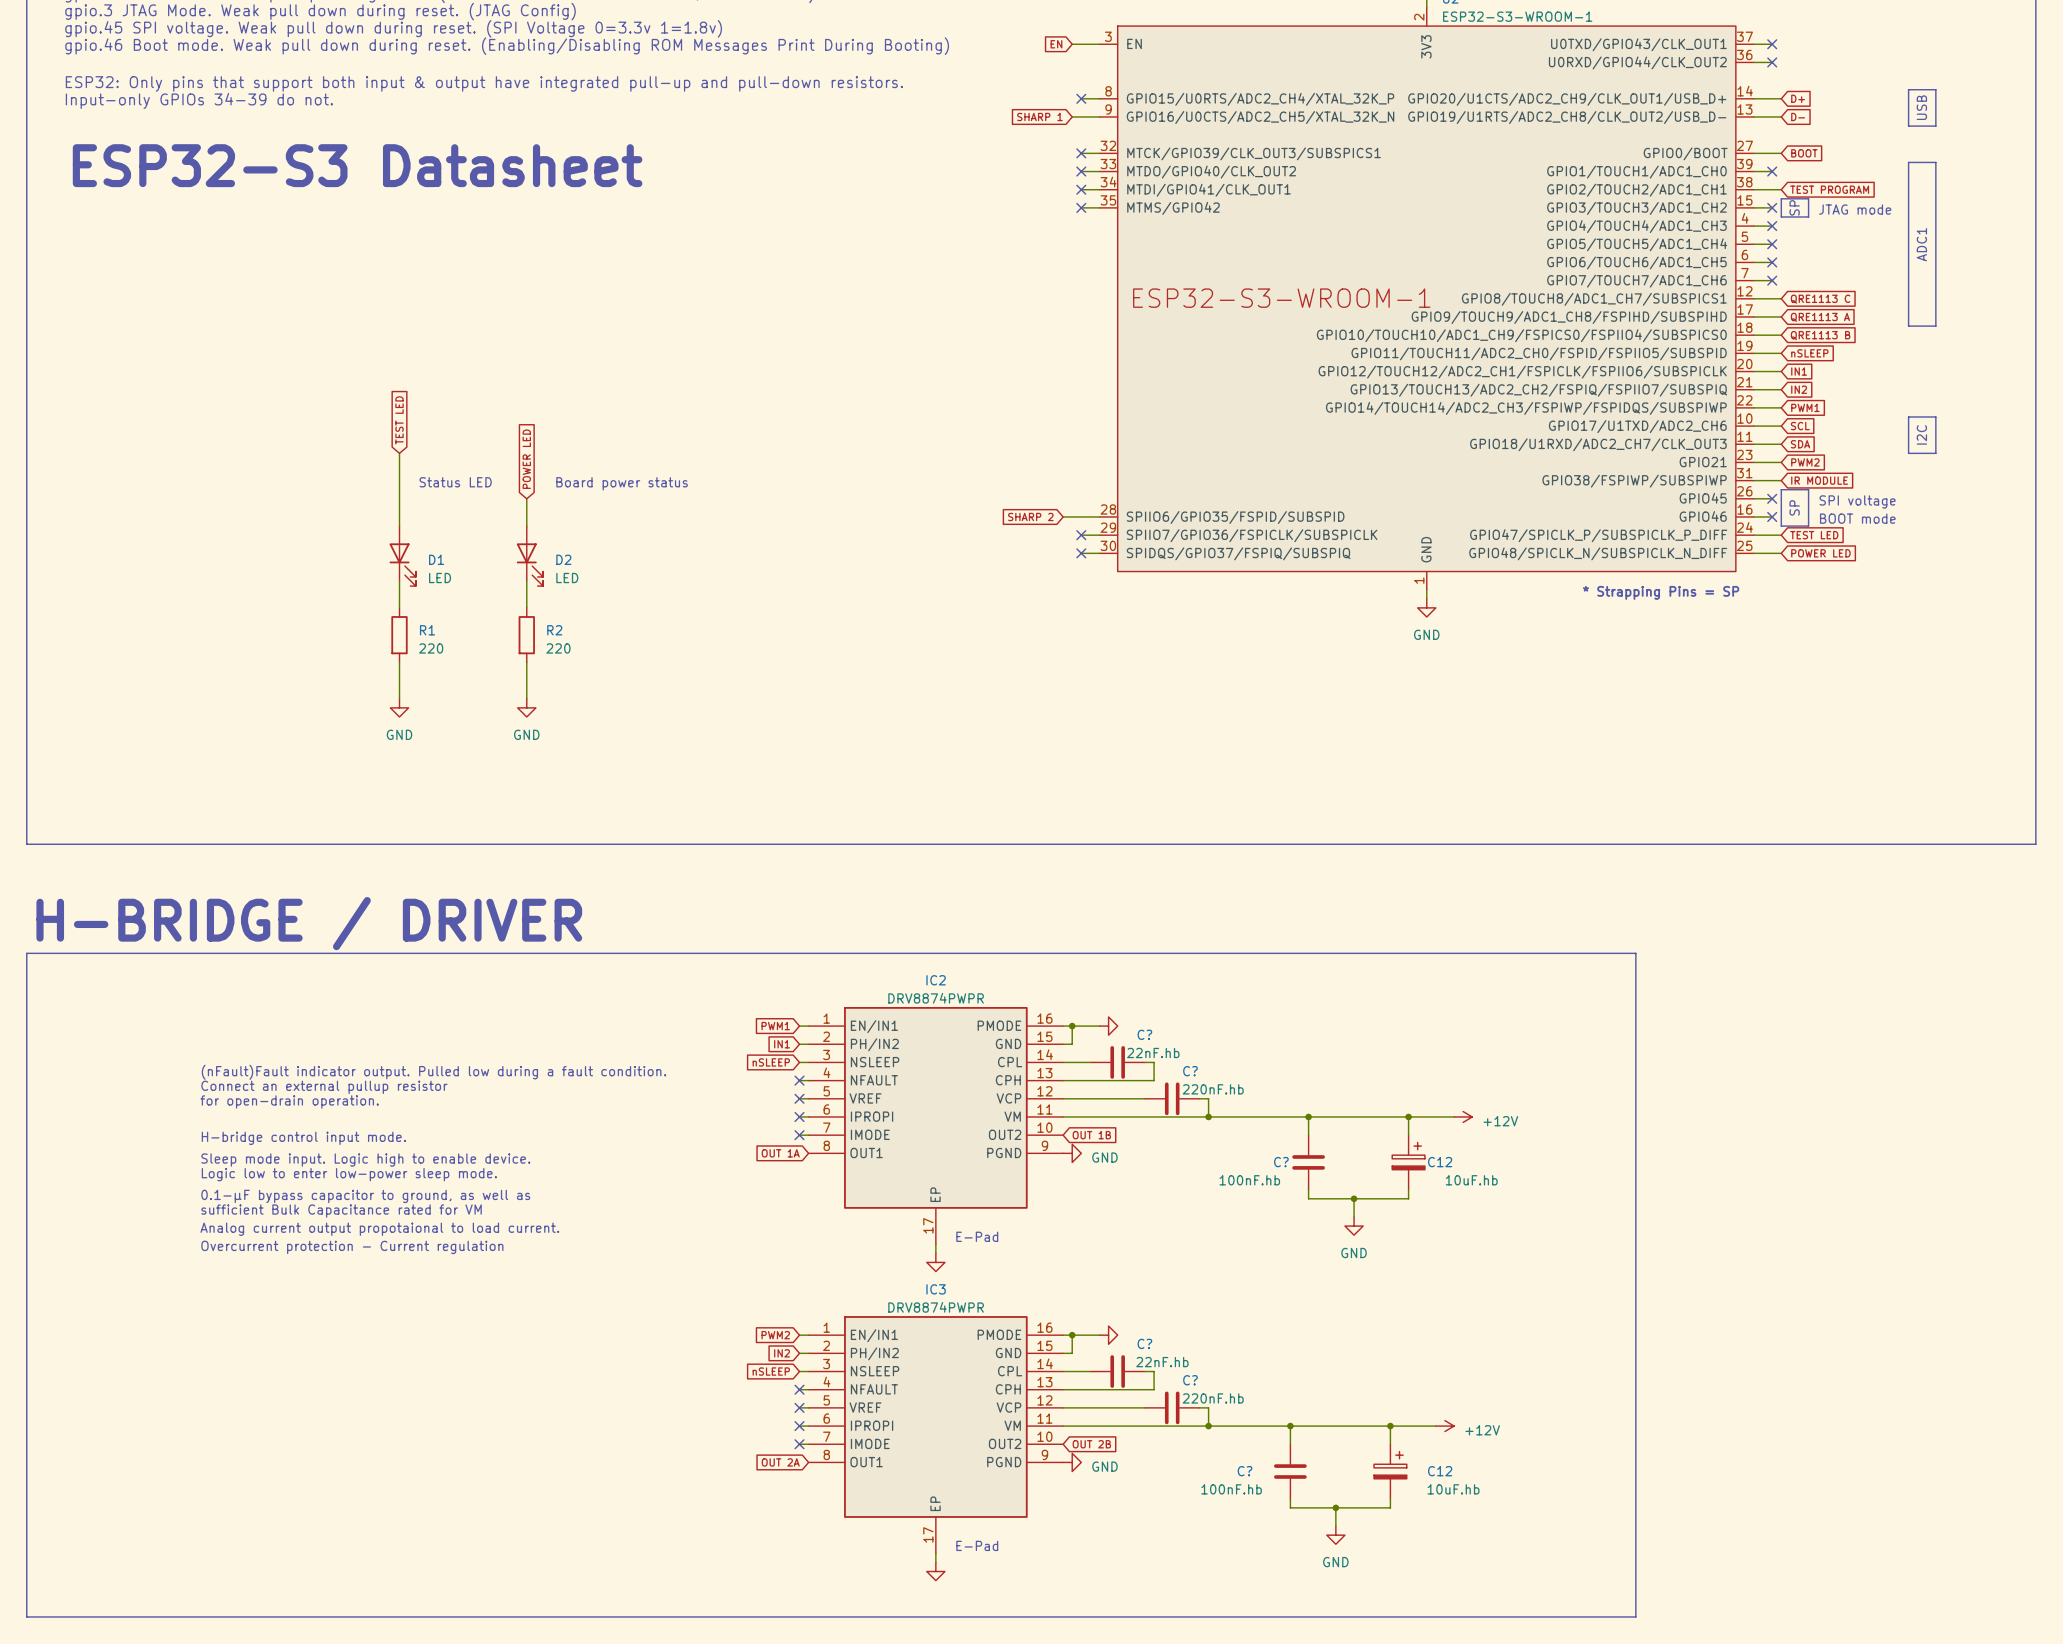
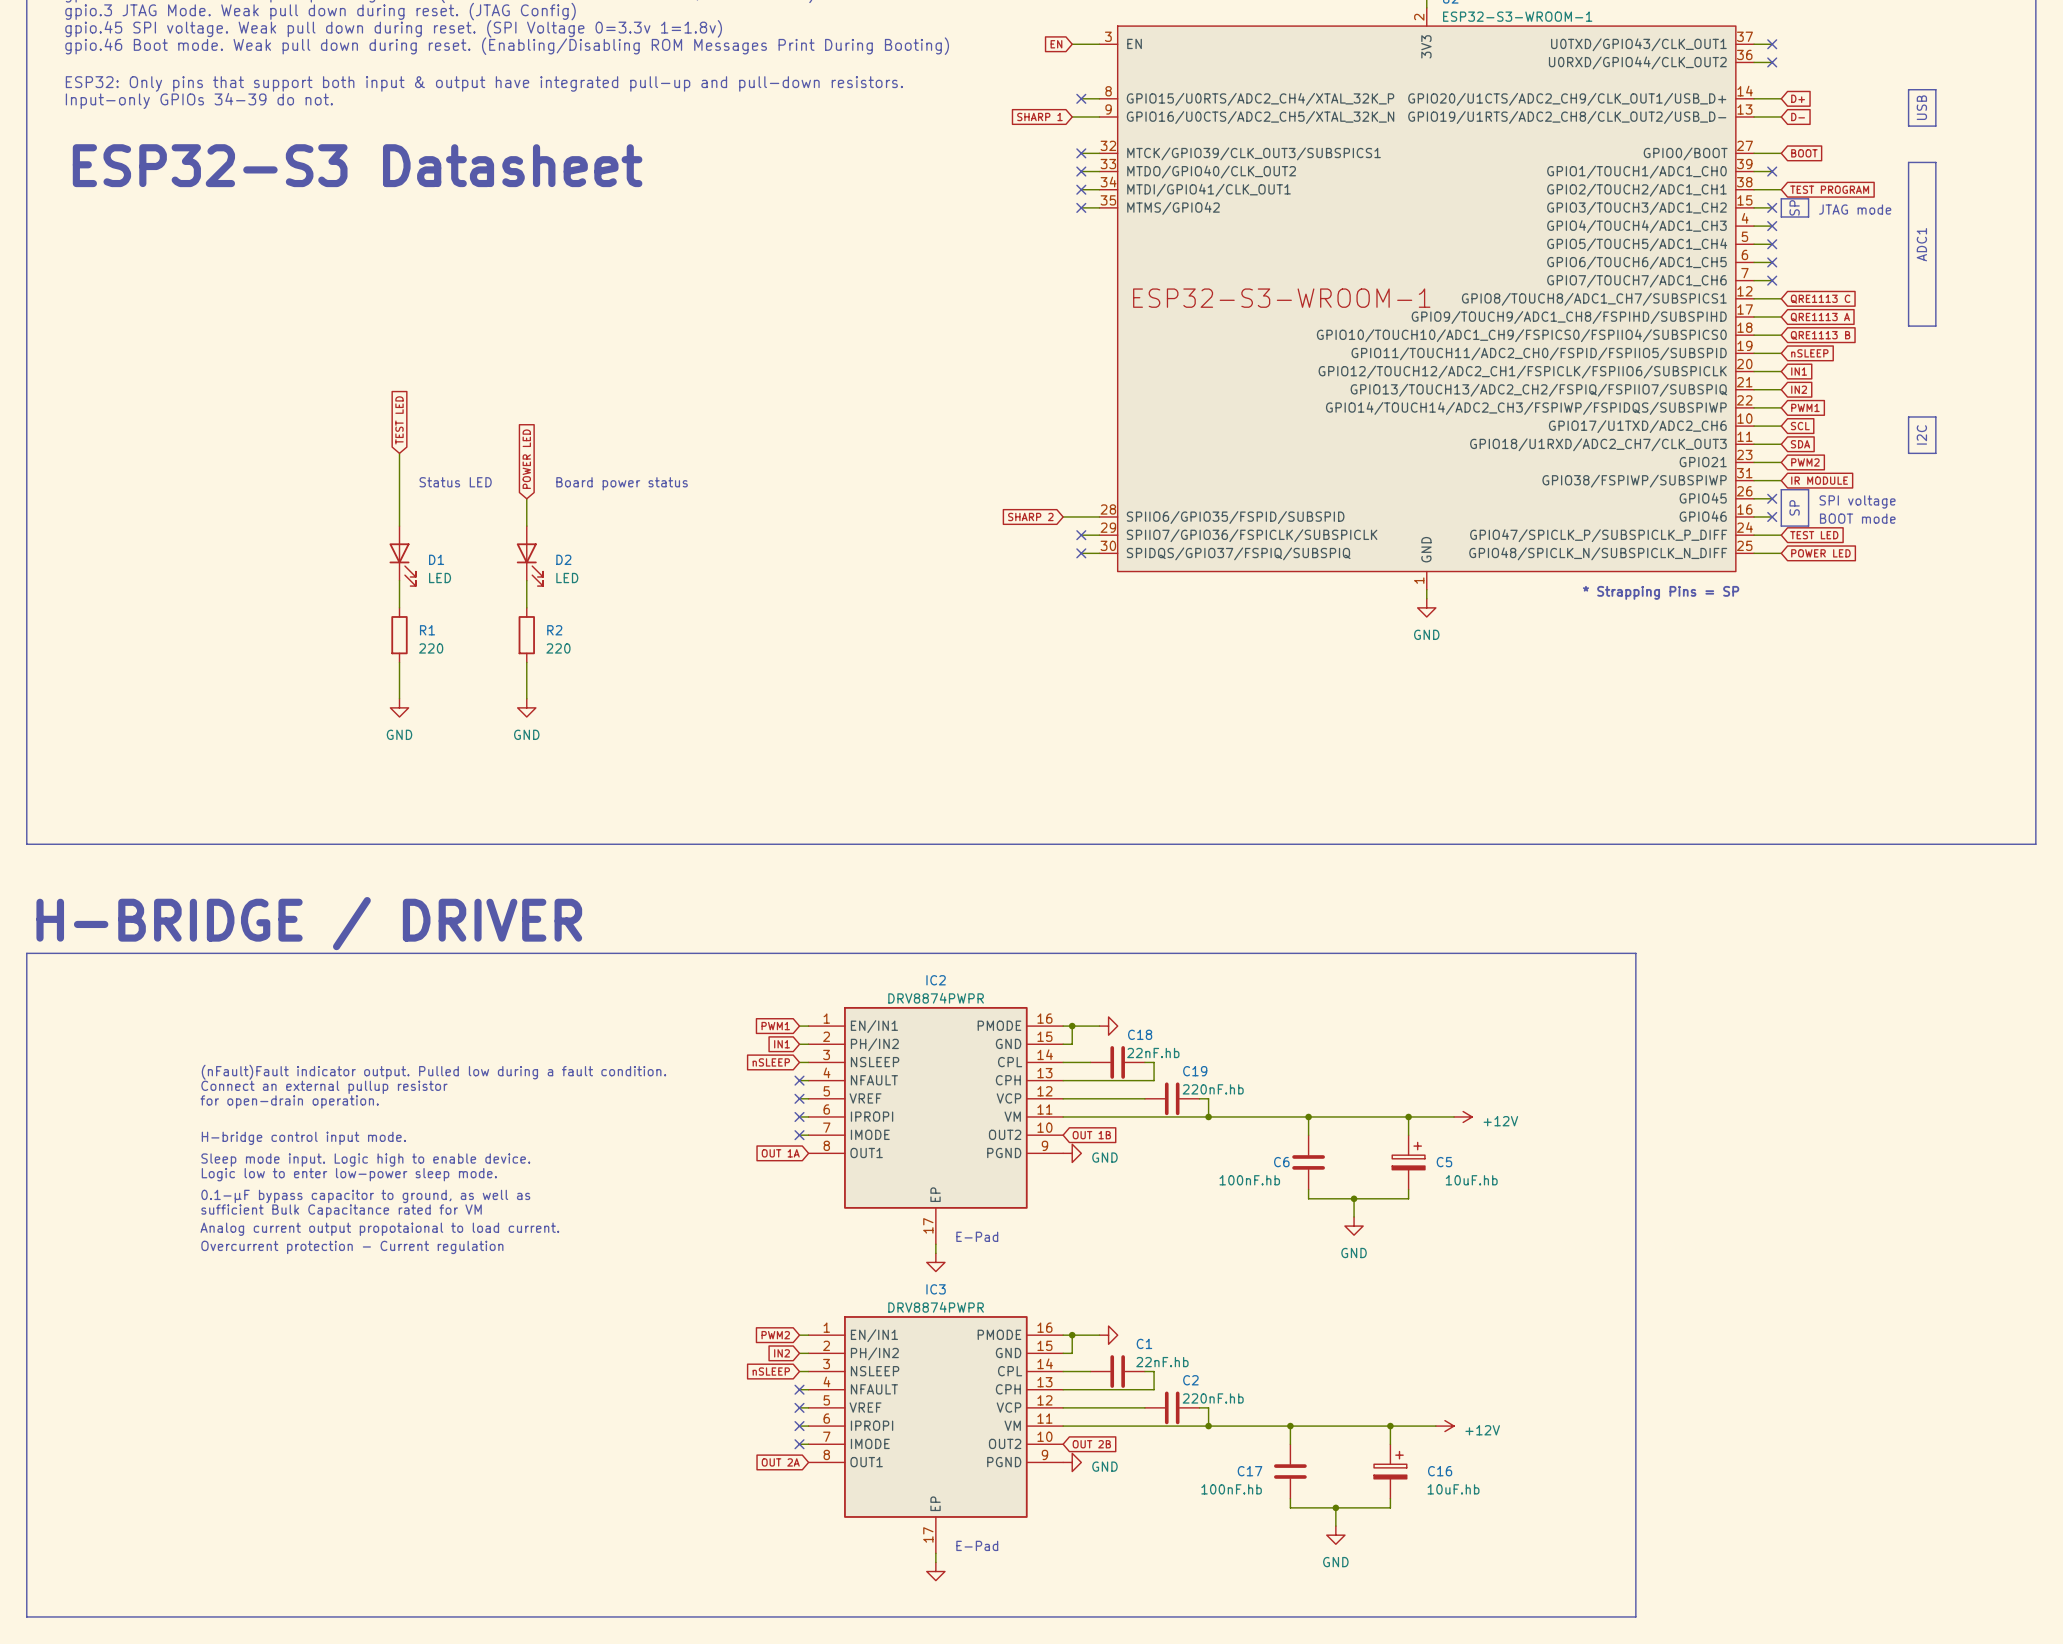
C? name: C? (1144, 1034) -> C18 (1140, 1034)
C? name: C? (1190, 1071) -> C19 (1195, 1071)
C? name: C? (1281, 1162) -> C6 (1281, 1162)
C12 name: C12 (1440, 1162) -> C5 (1444, 1162)
C? name: C? (1144, 1343) -> C1 (1144, 1343)
C? name: C? (1190, 1380) -> C2 (1190, 1380)
C? name: C? (1245, 1471) -> C17 (1249, 1471)
C12 name: C12 (1440, 1471) -> C16 (1440, 1471)

